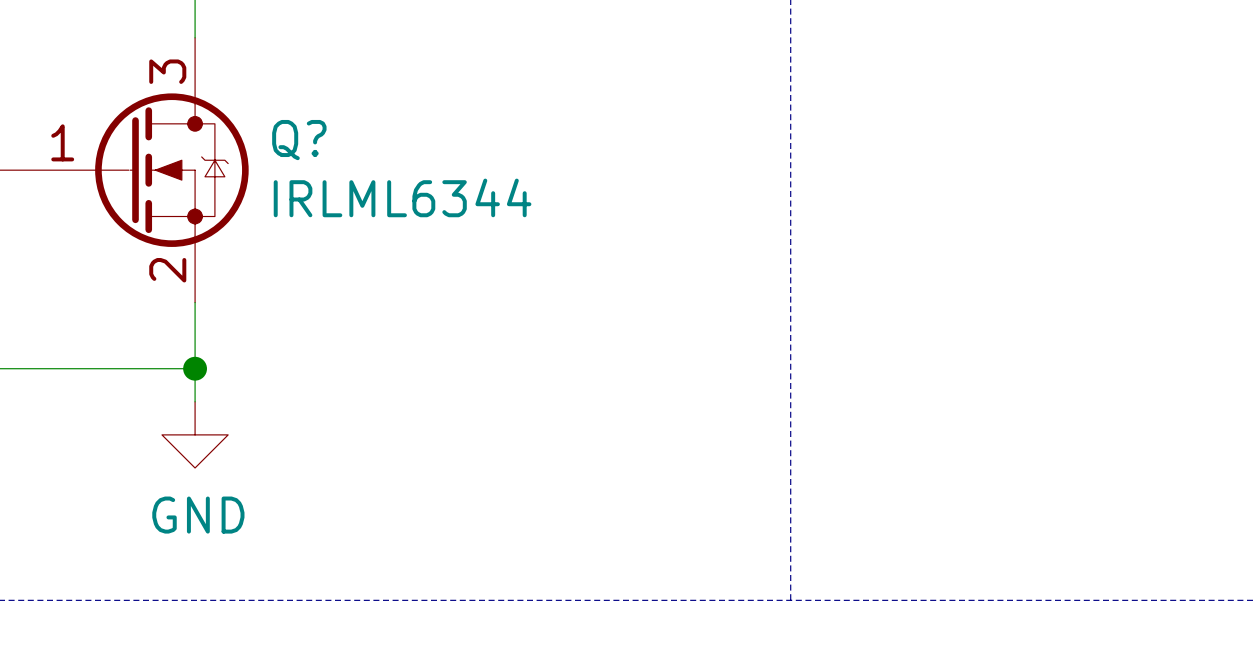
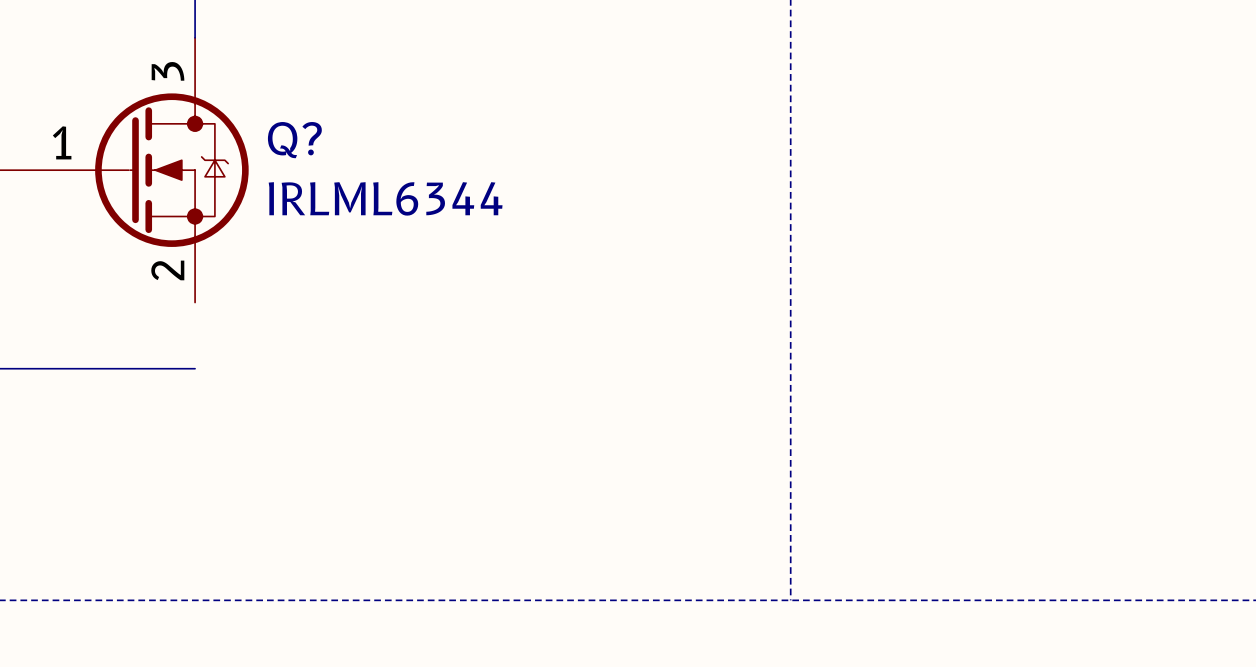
wire: (195, 302) (195, 401) -> none
junction: (195, 368) -> none
power symbol: GND (195, 434) -> none

